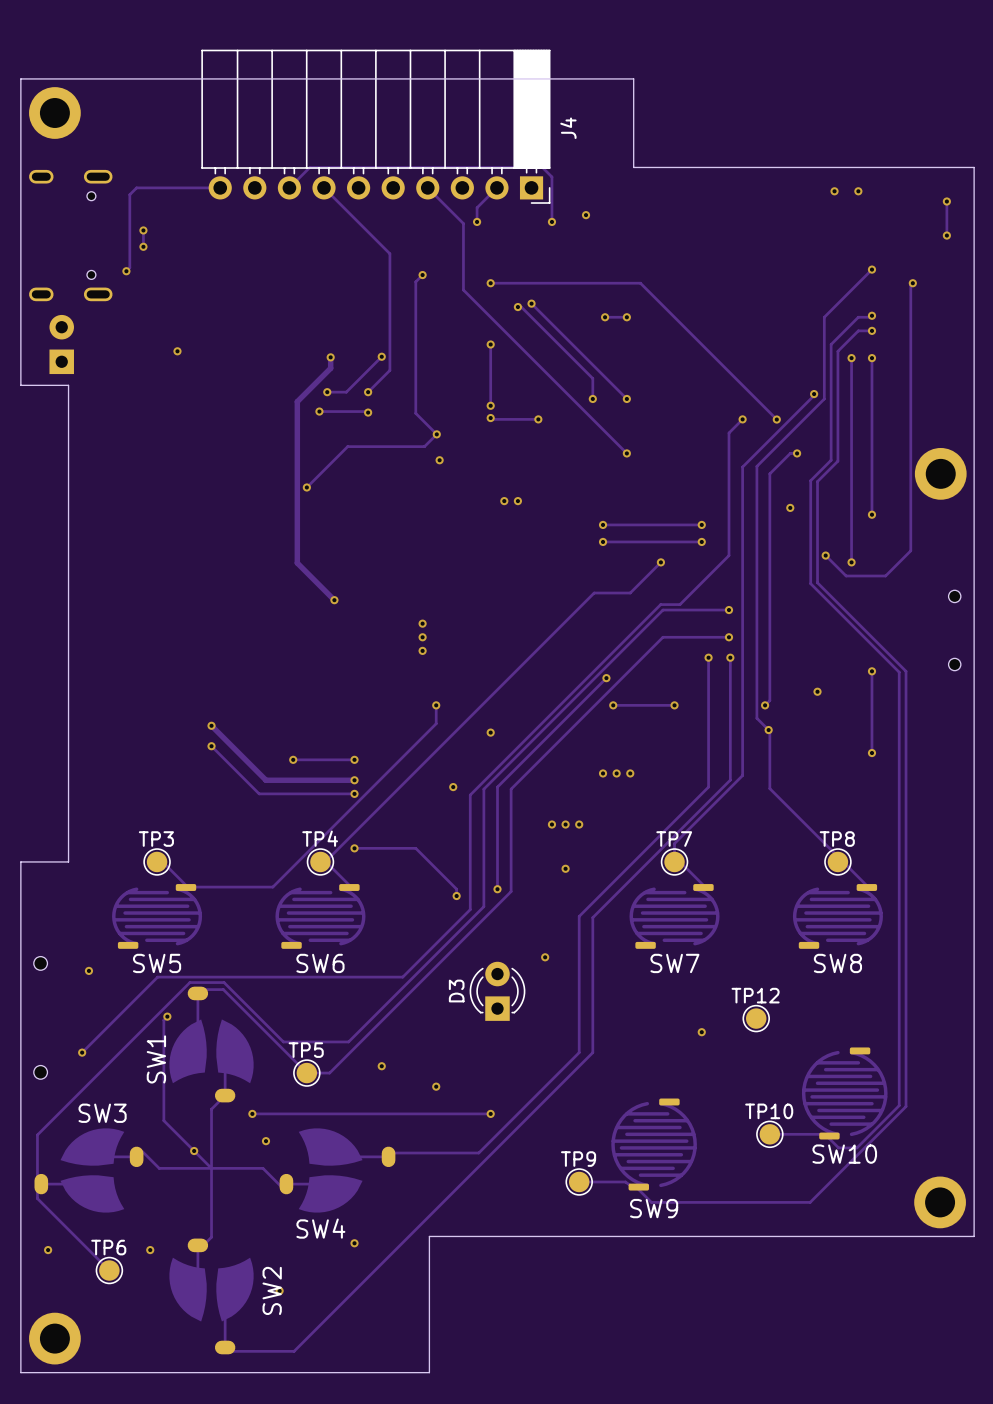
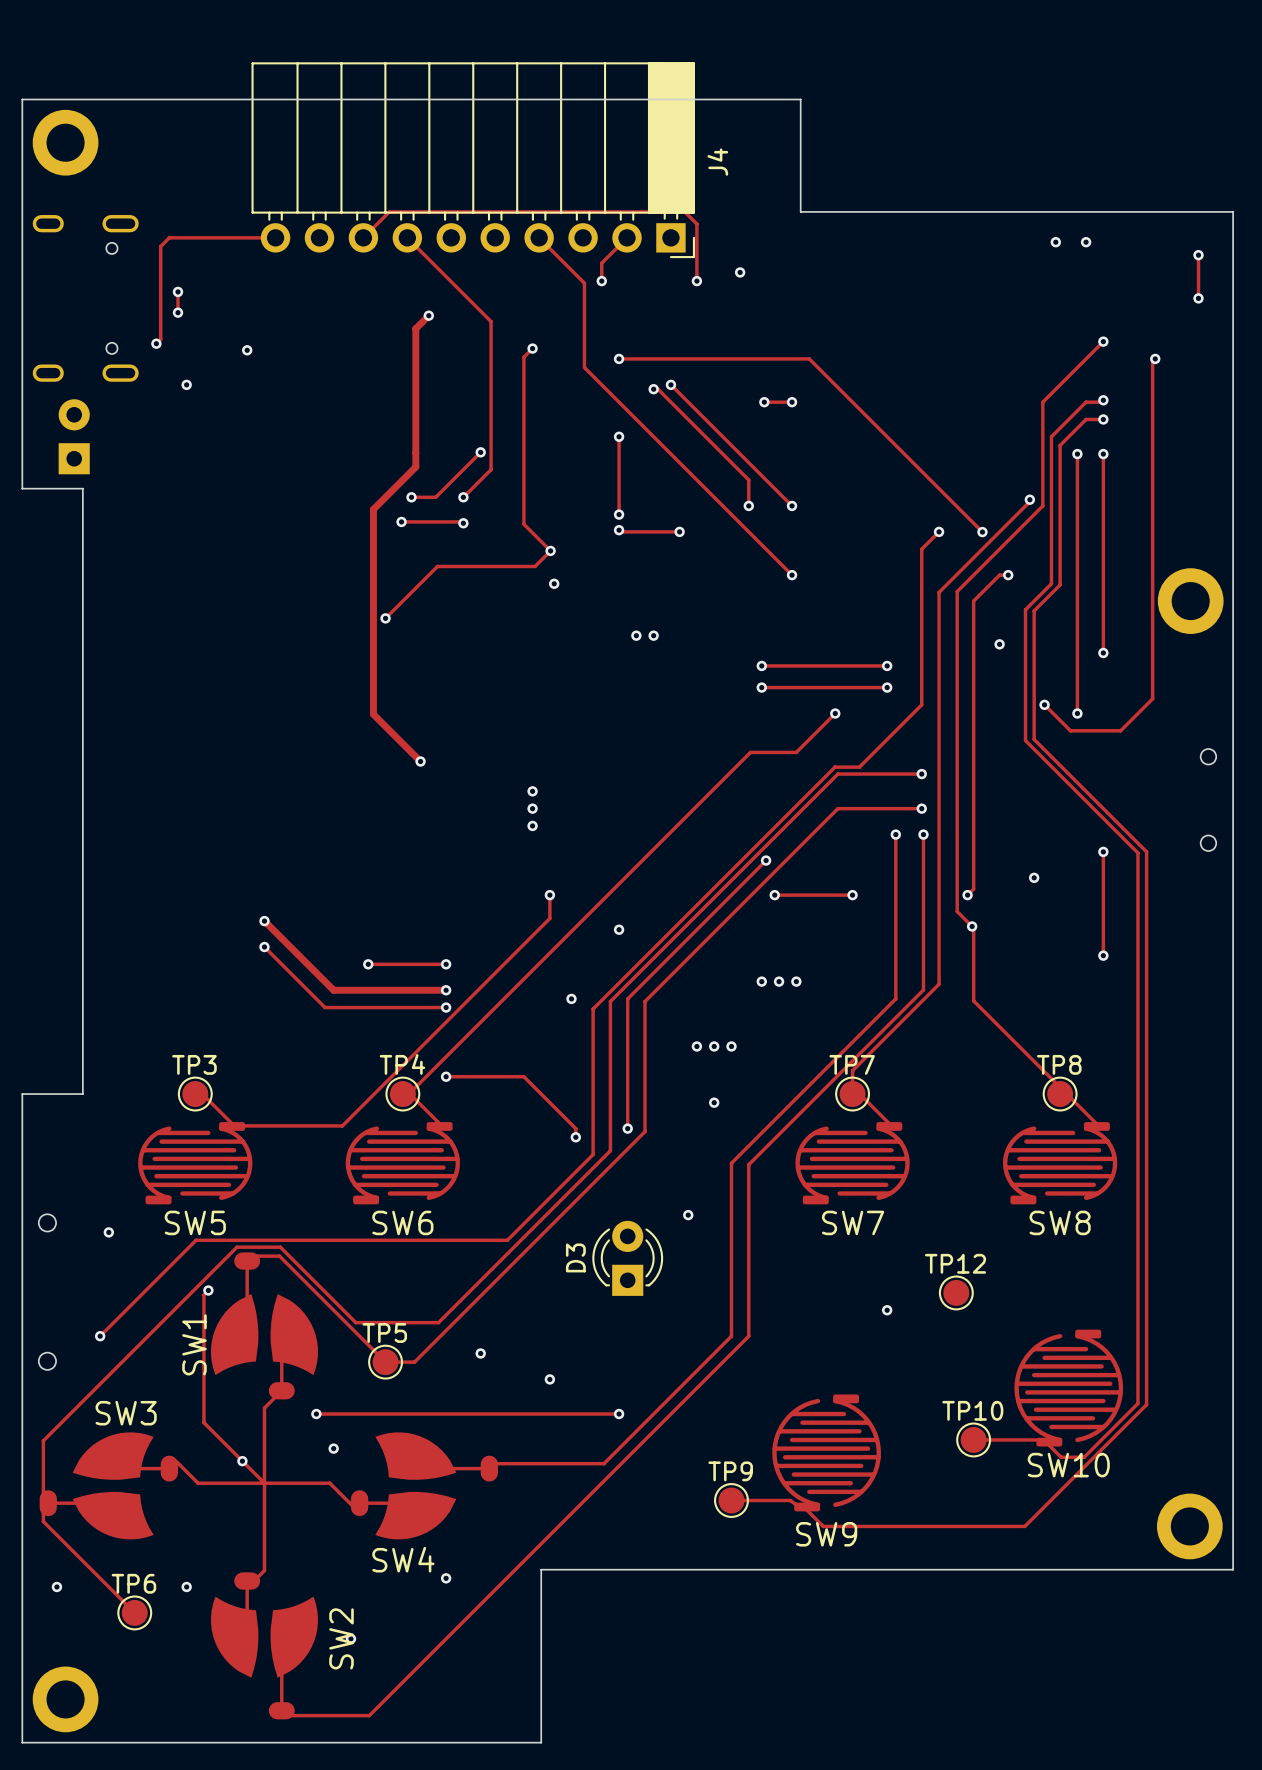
track: none -> (428, 315) (415, 328) (415, 453)
via: none -> (428, 315)
via: none -> (247, 350)
via: none -> (186, 384)
via: (177, 351) -> none
via: (330, 357) -> none

